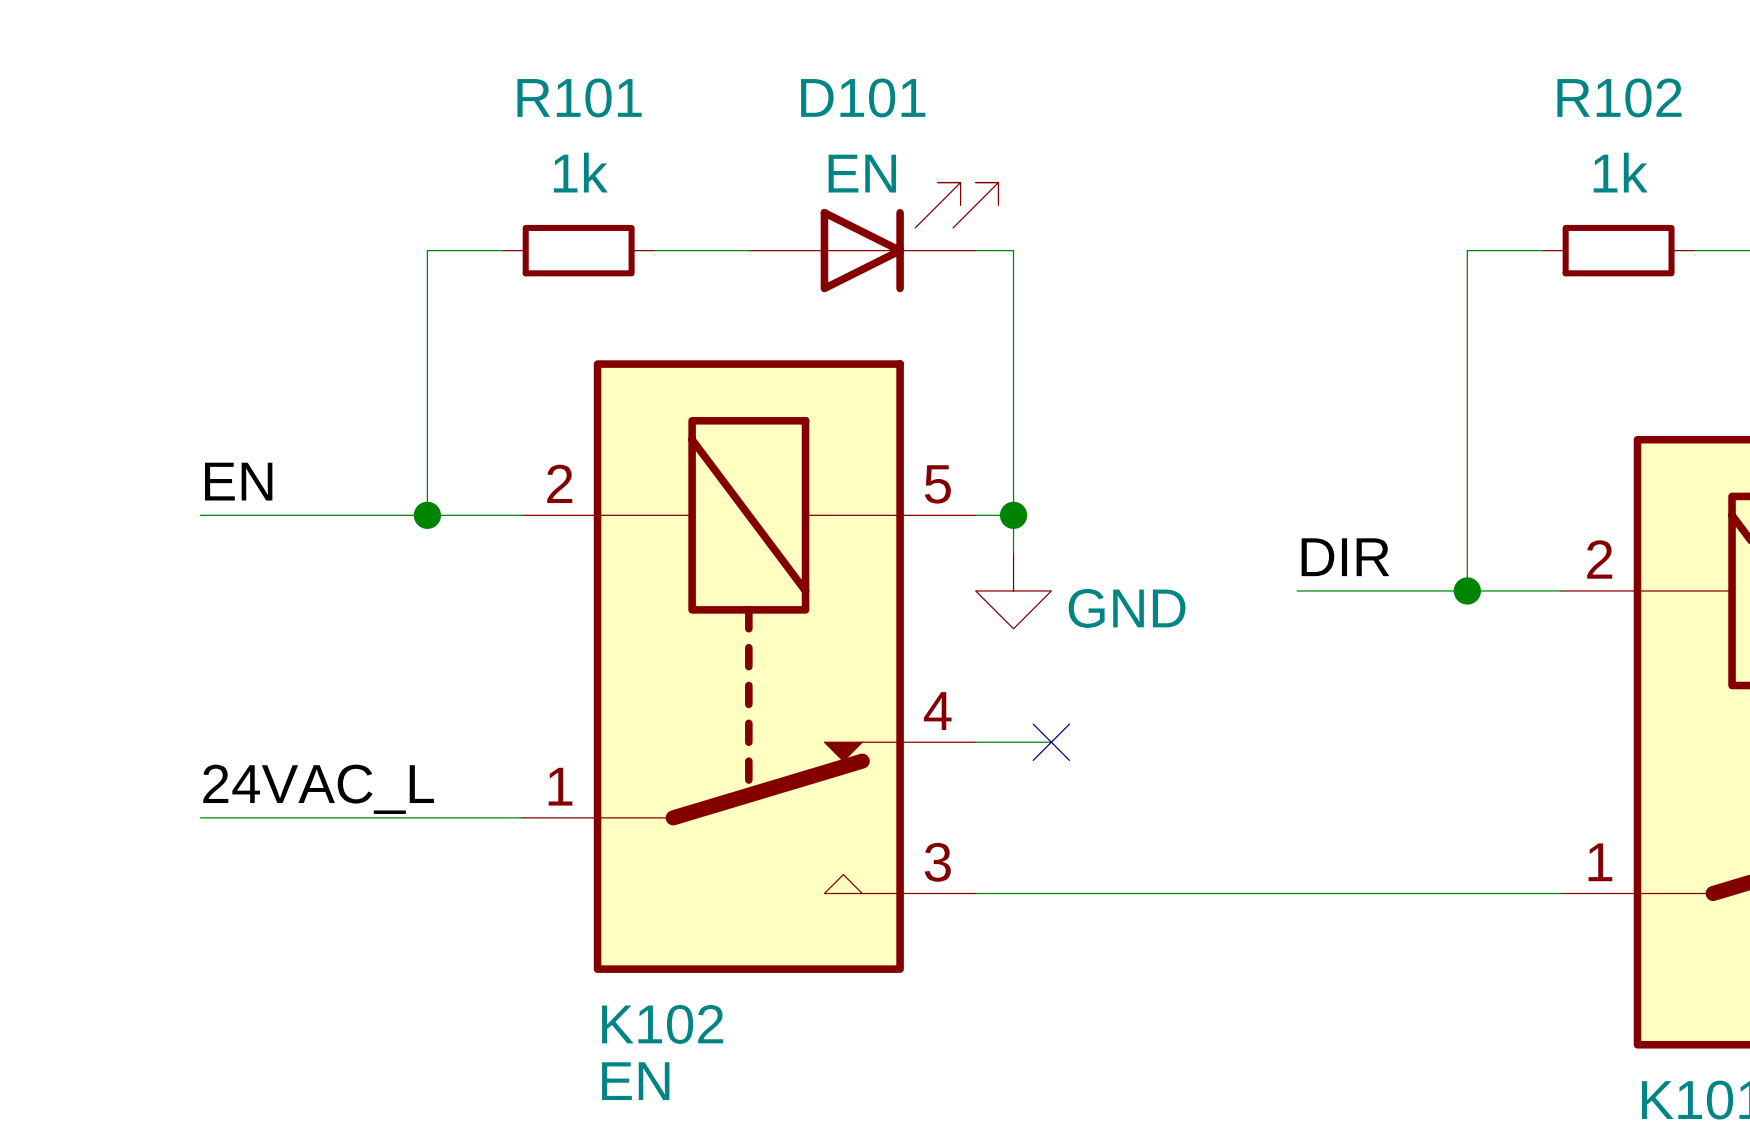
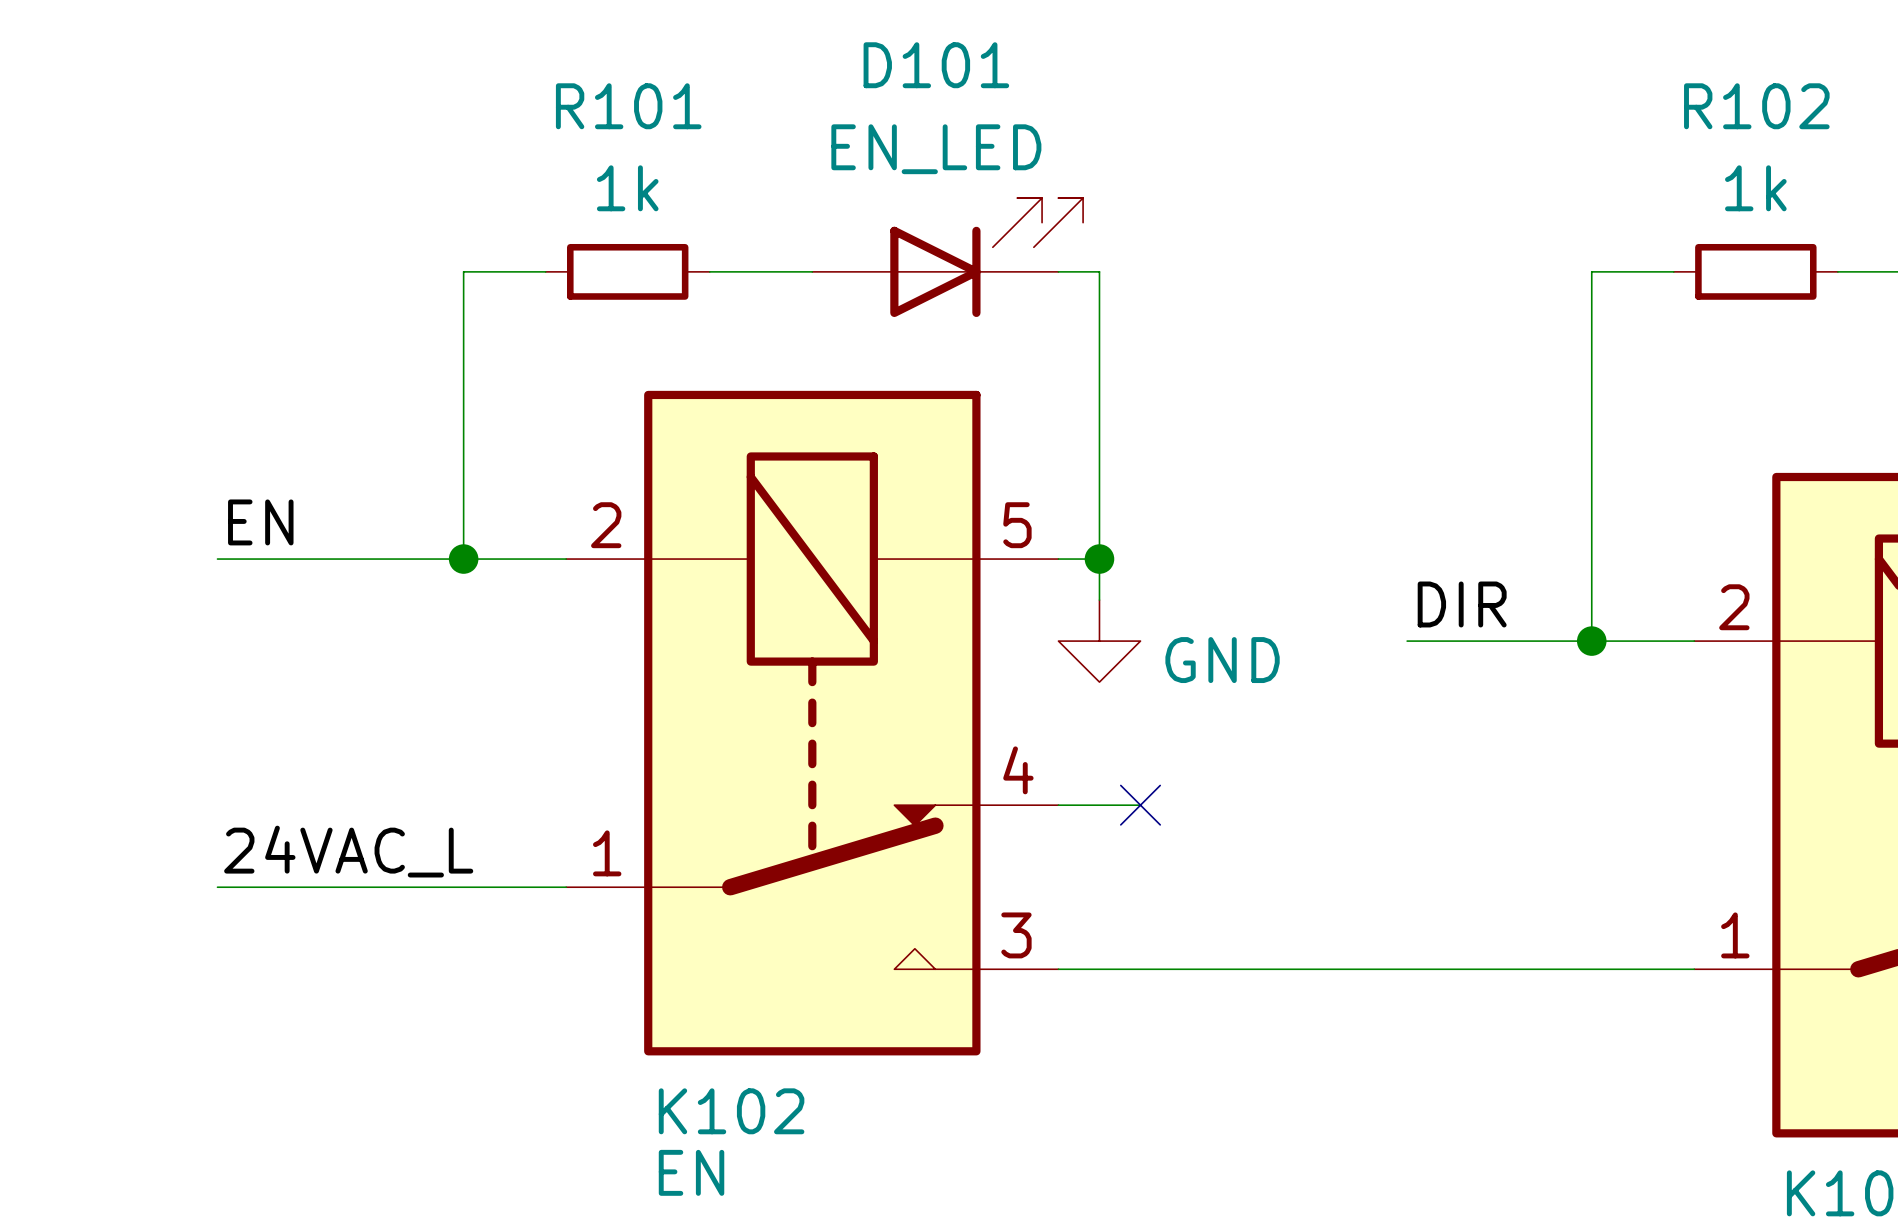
D101 name position: D101 (863, 97) -> D101 (936, 65)
D101 value: EN (862, 173) -> EN_LED (936, 149)

